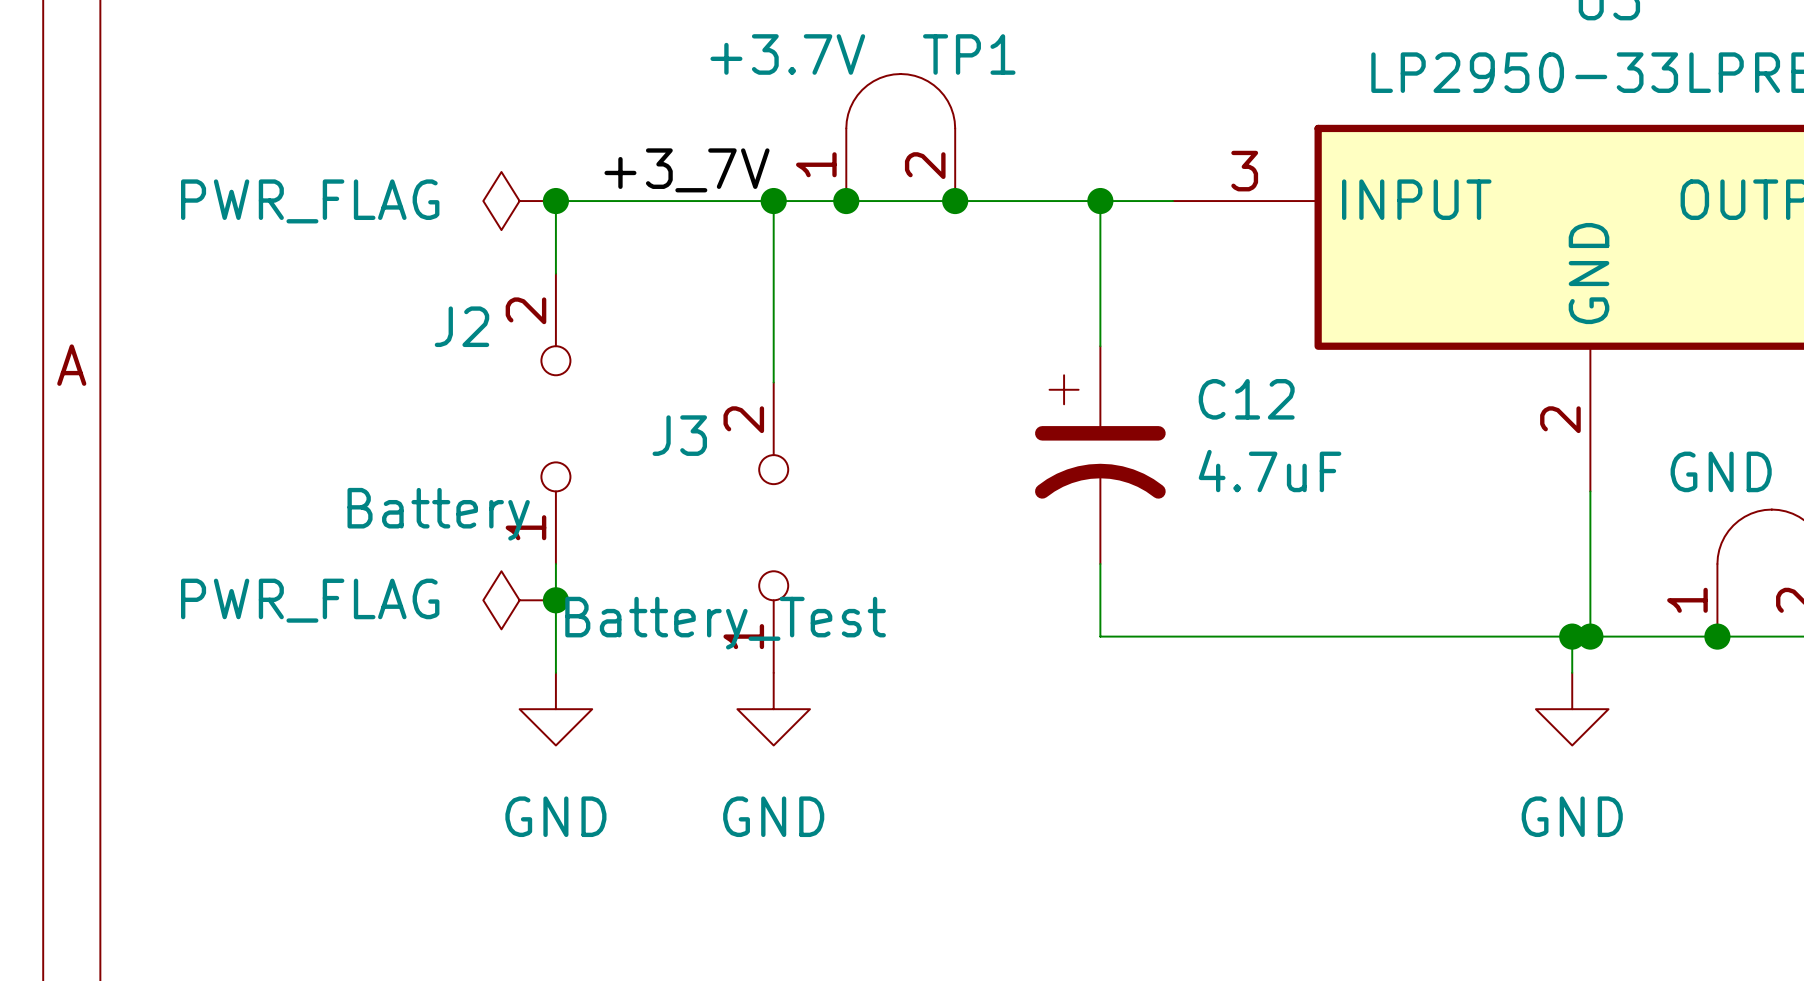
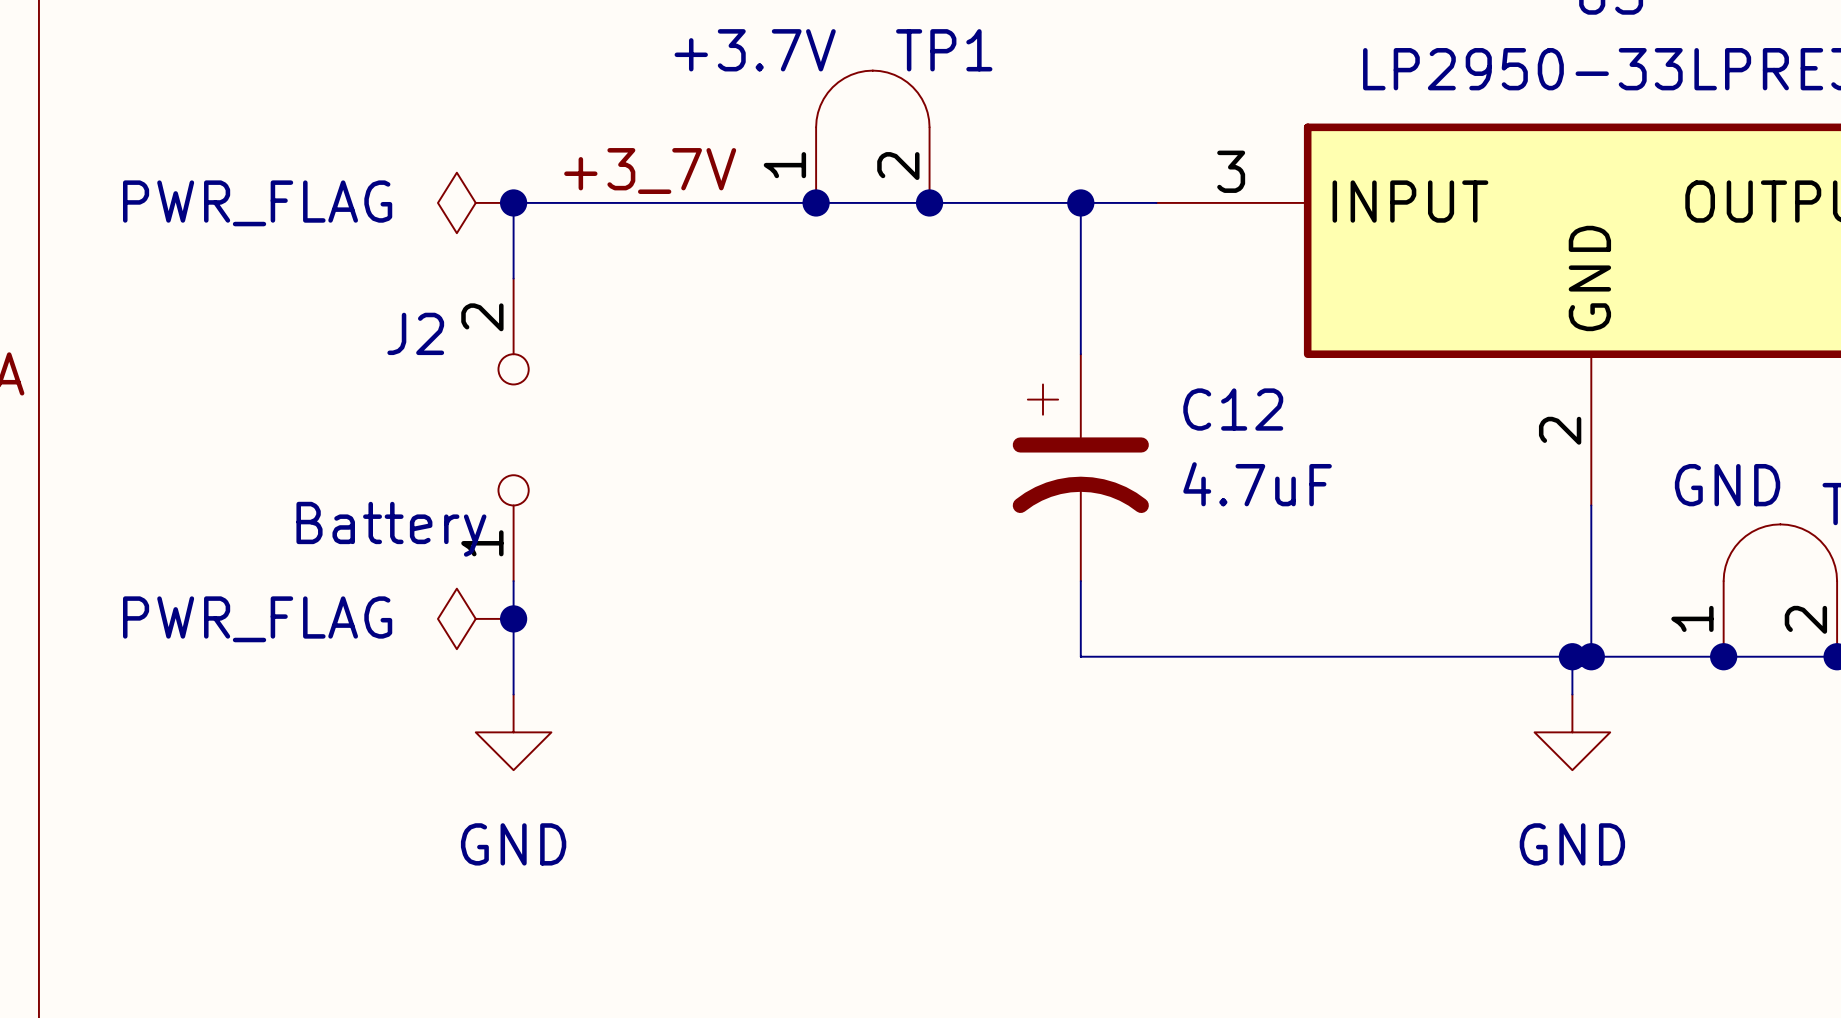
wire: (773, 201) (773, 382) -> none
junction: (773, 201) -> none
J3: Battery_Test (773, 527) -> none
power symbol: GND (773, 709) -> none

